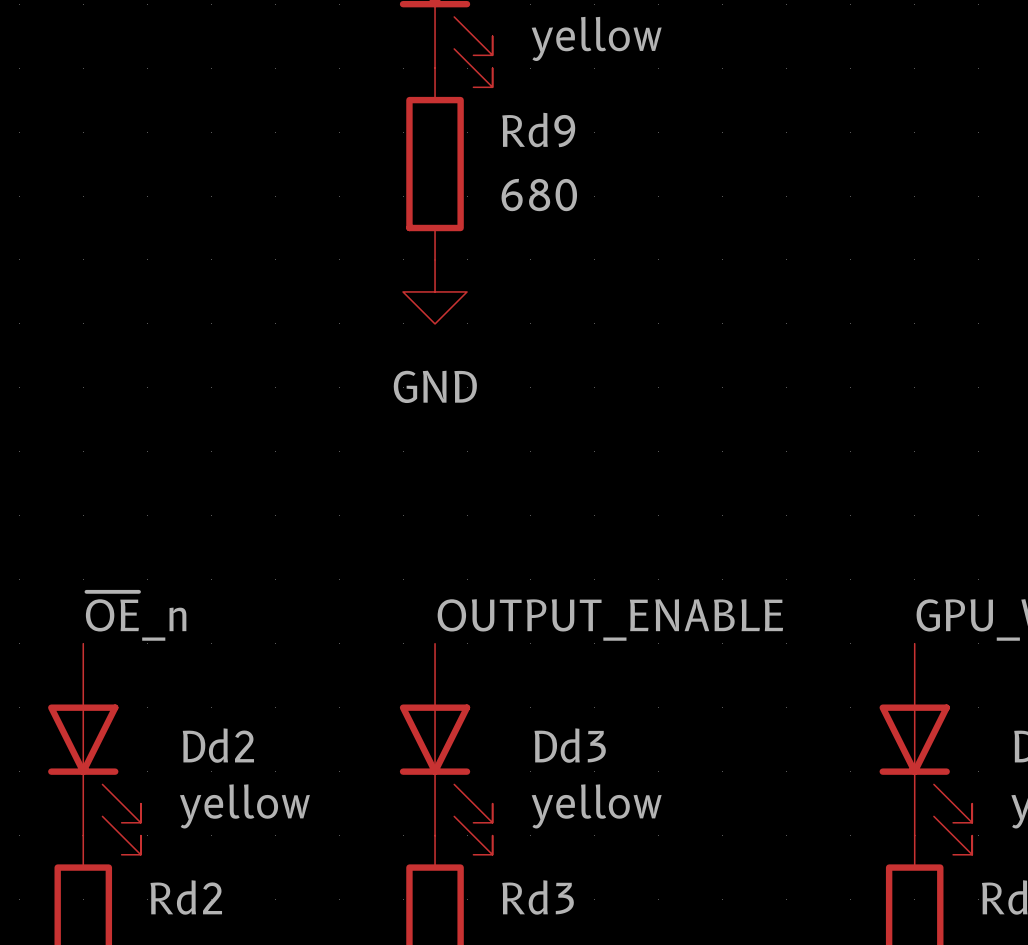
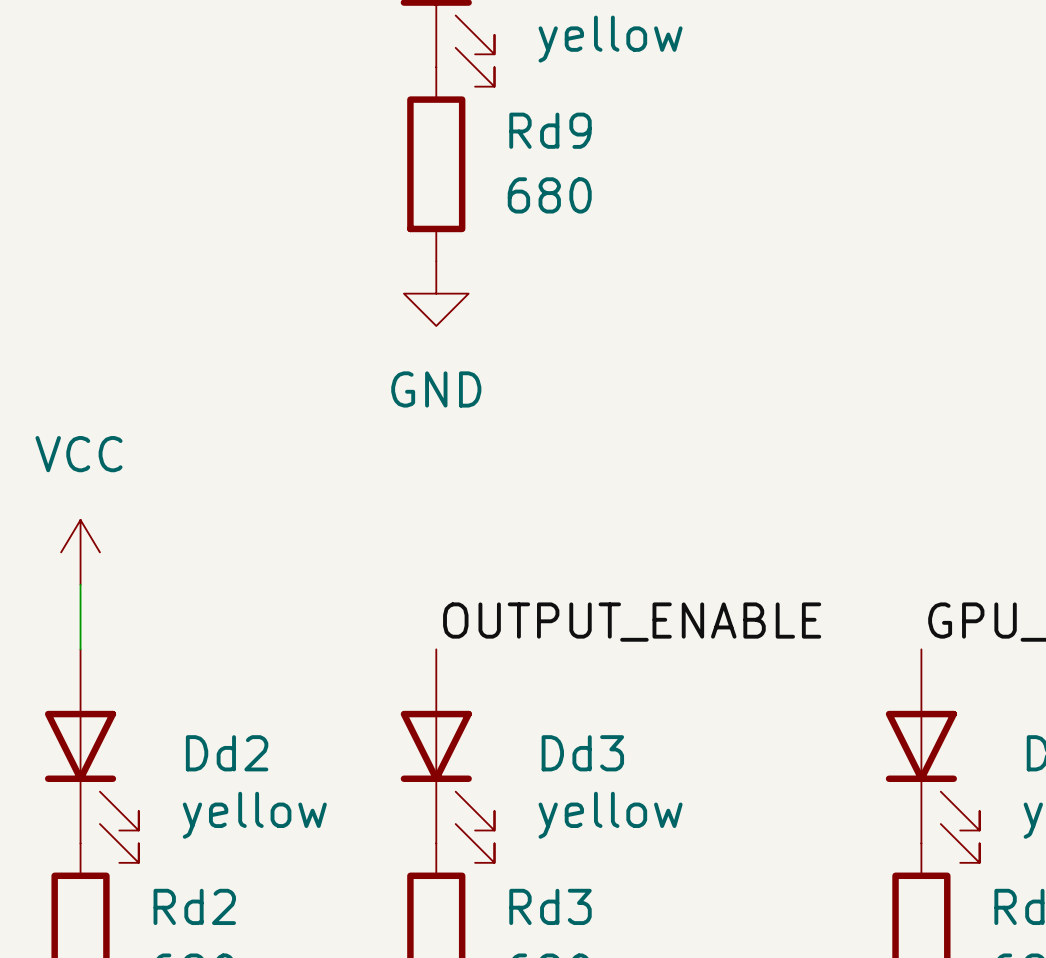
power symbol: none -> VCC (80, 552)
wire: none -> (80, 584) (80, 649)
label: ~{OE}_n (136, 616) -> none

